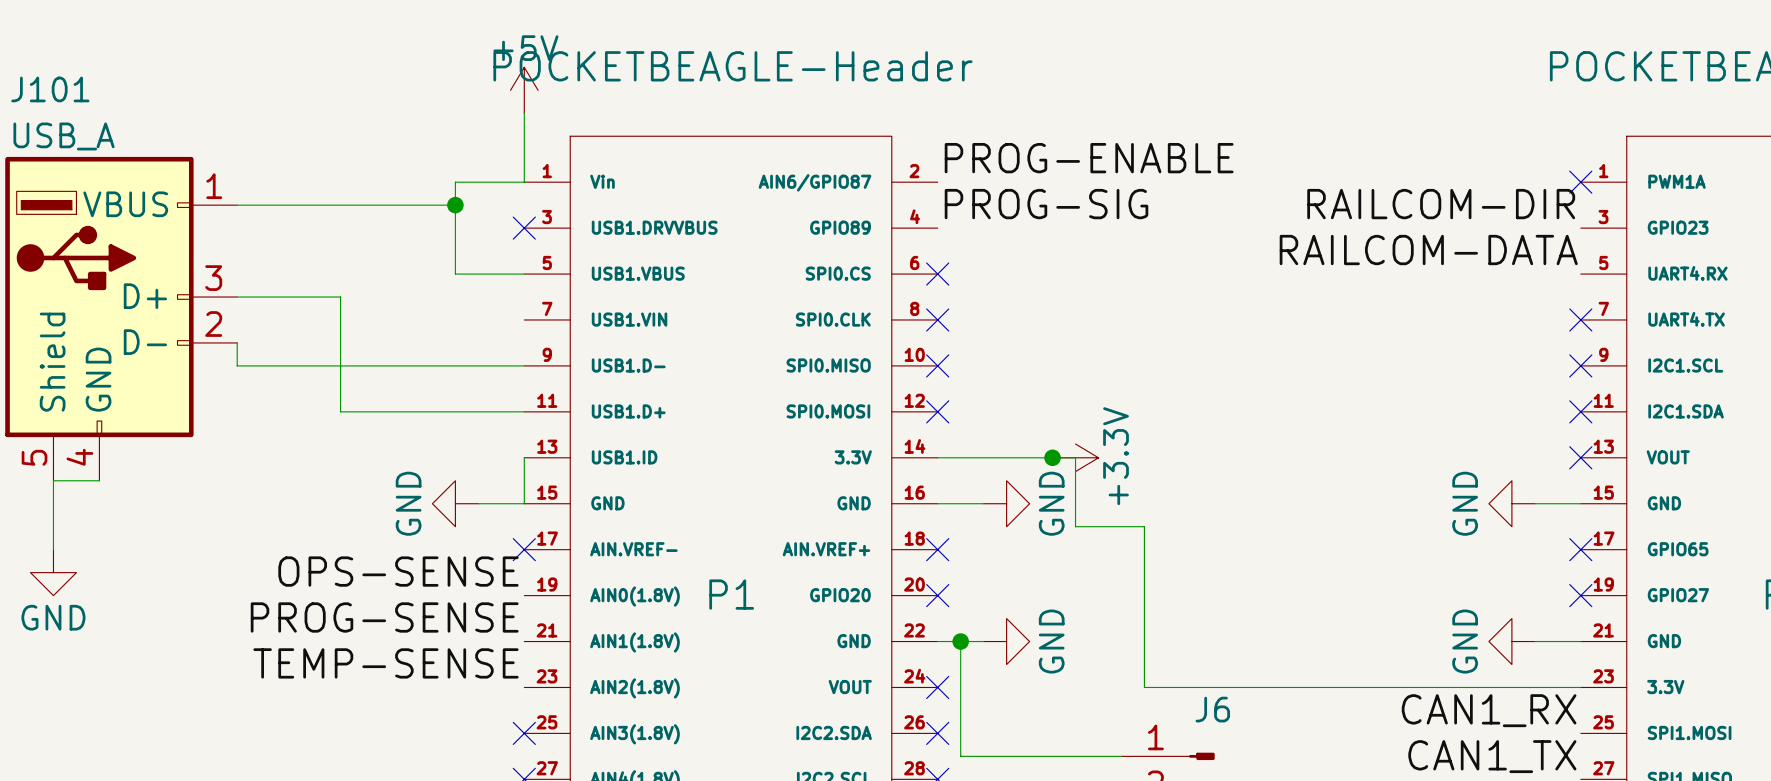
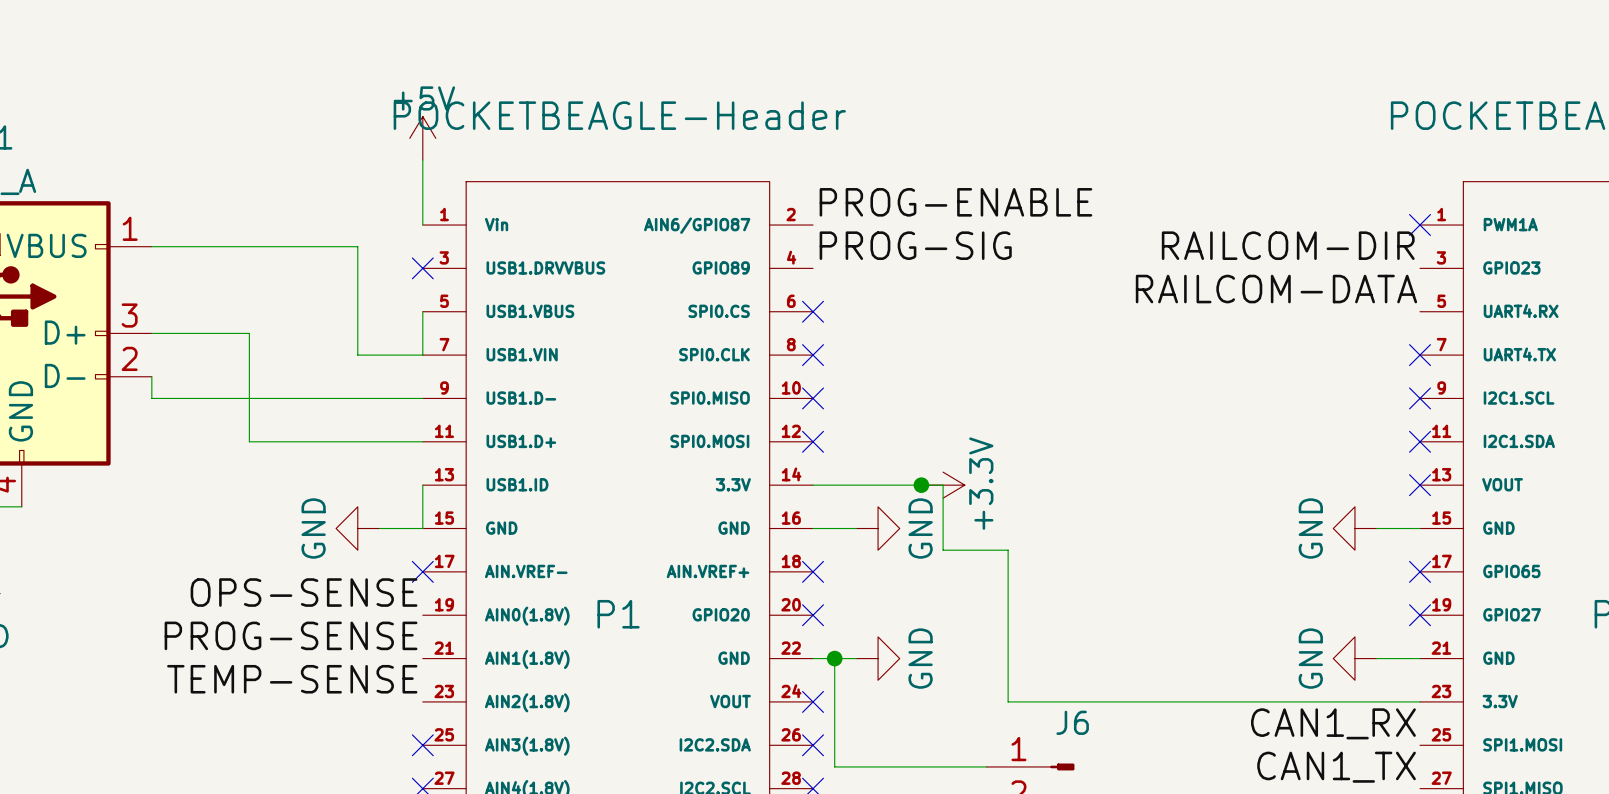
wire: (524, 182) (455, 182) (455, 205) -> none
junction: (455, 205) -> none
wire: (455, 274) (524, 274) -> (357, 311) (357, 355) (422, 355) (422, 311)

